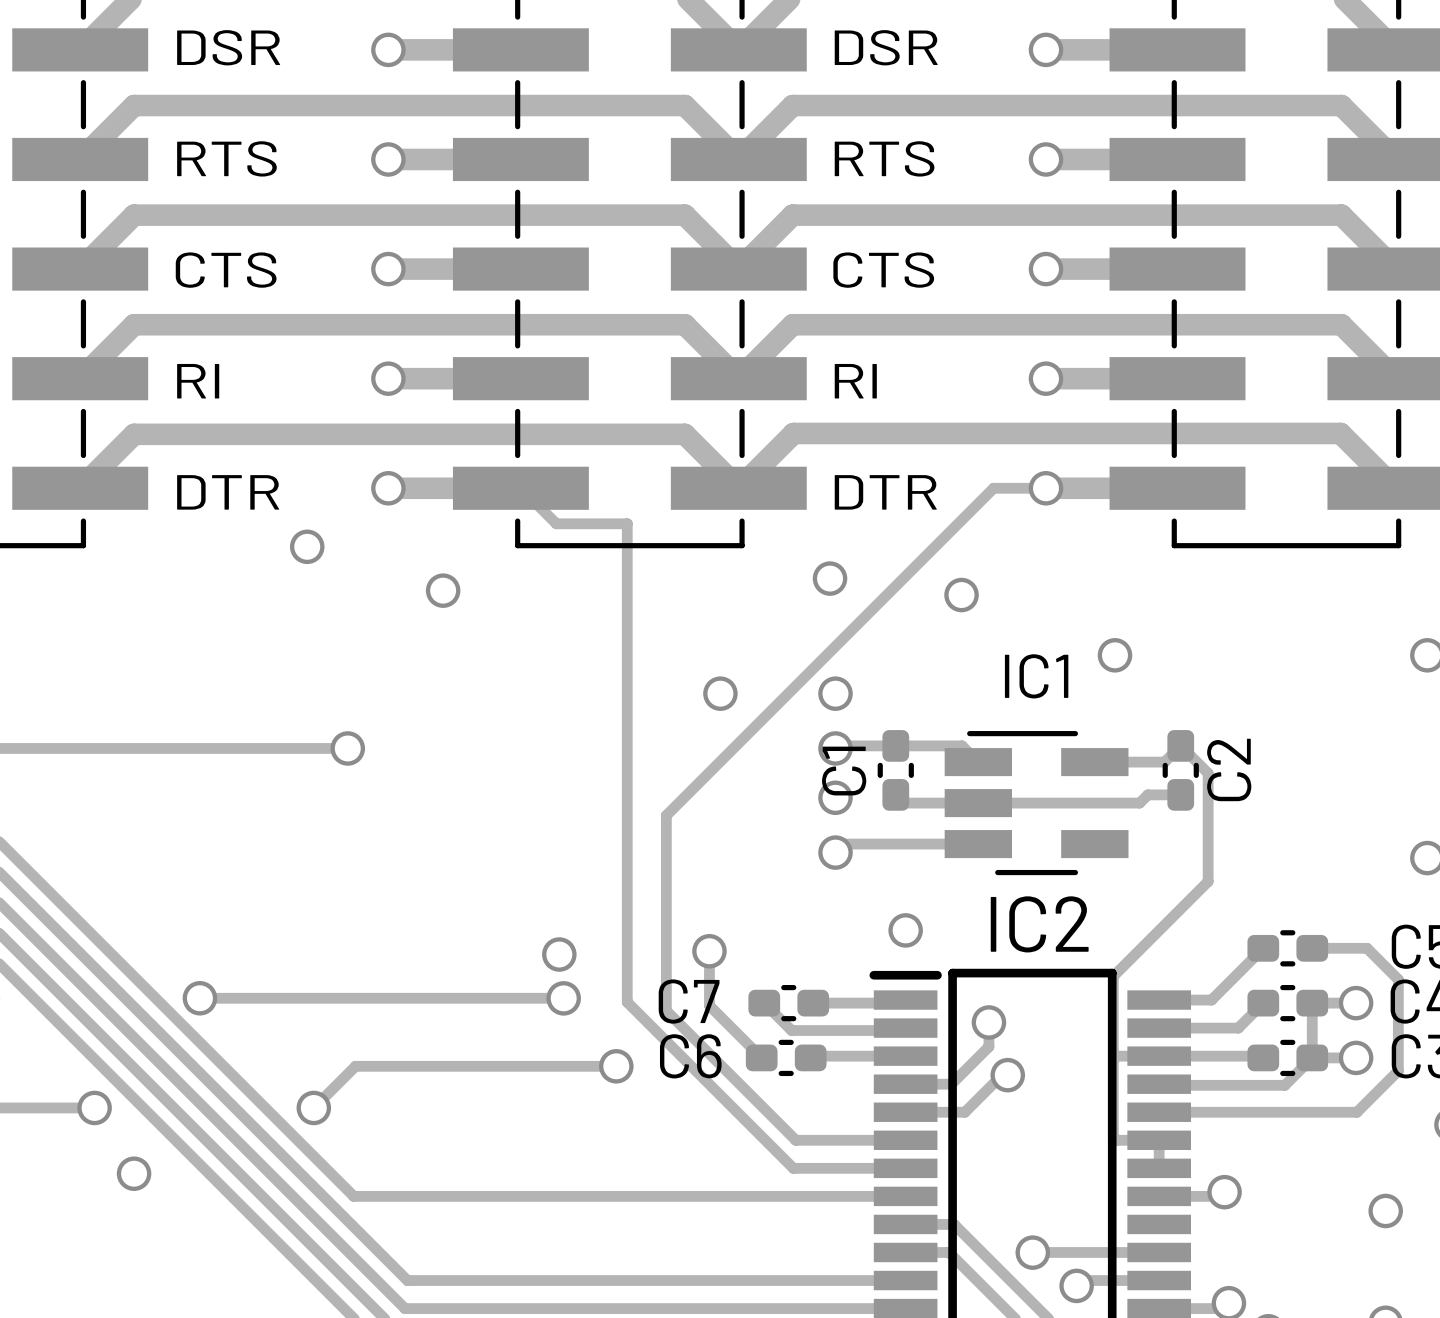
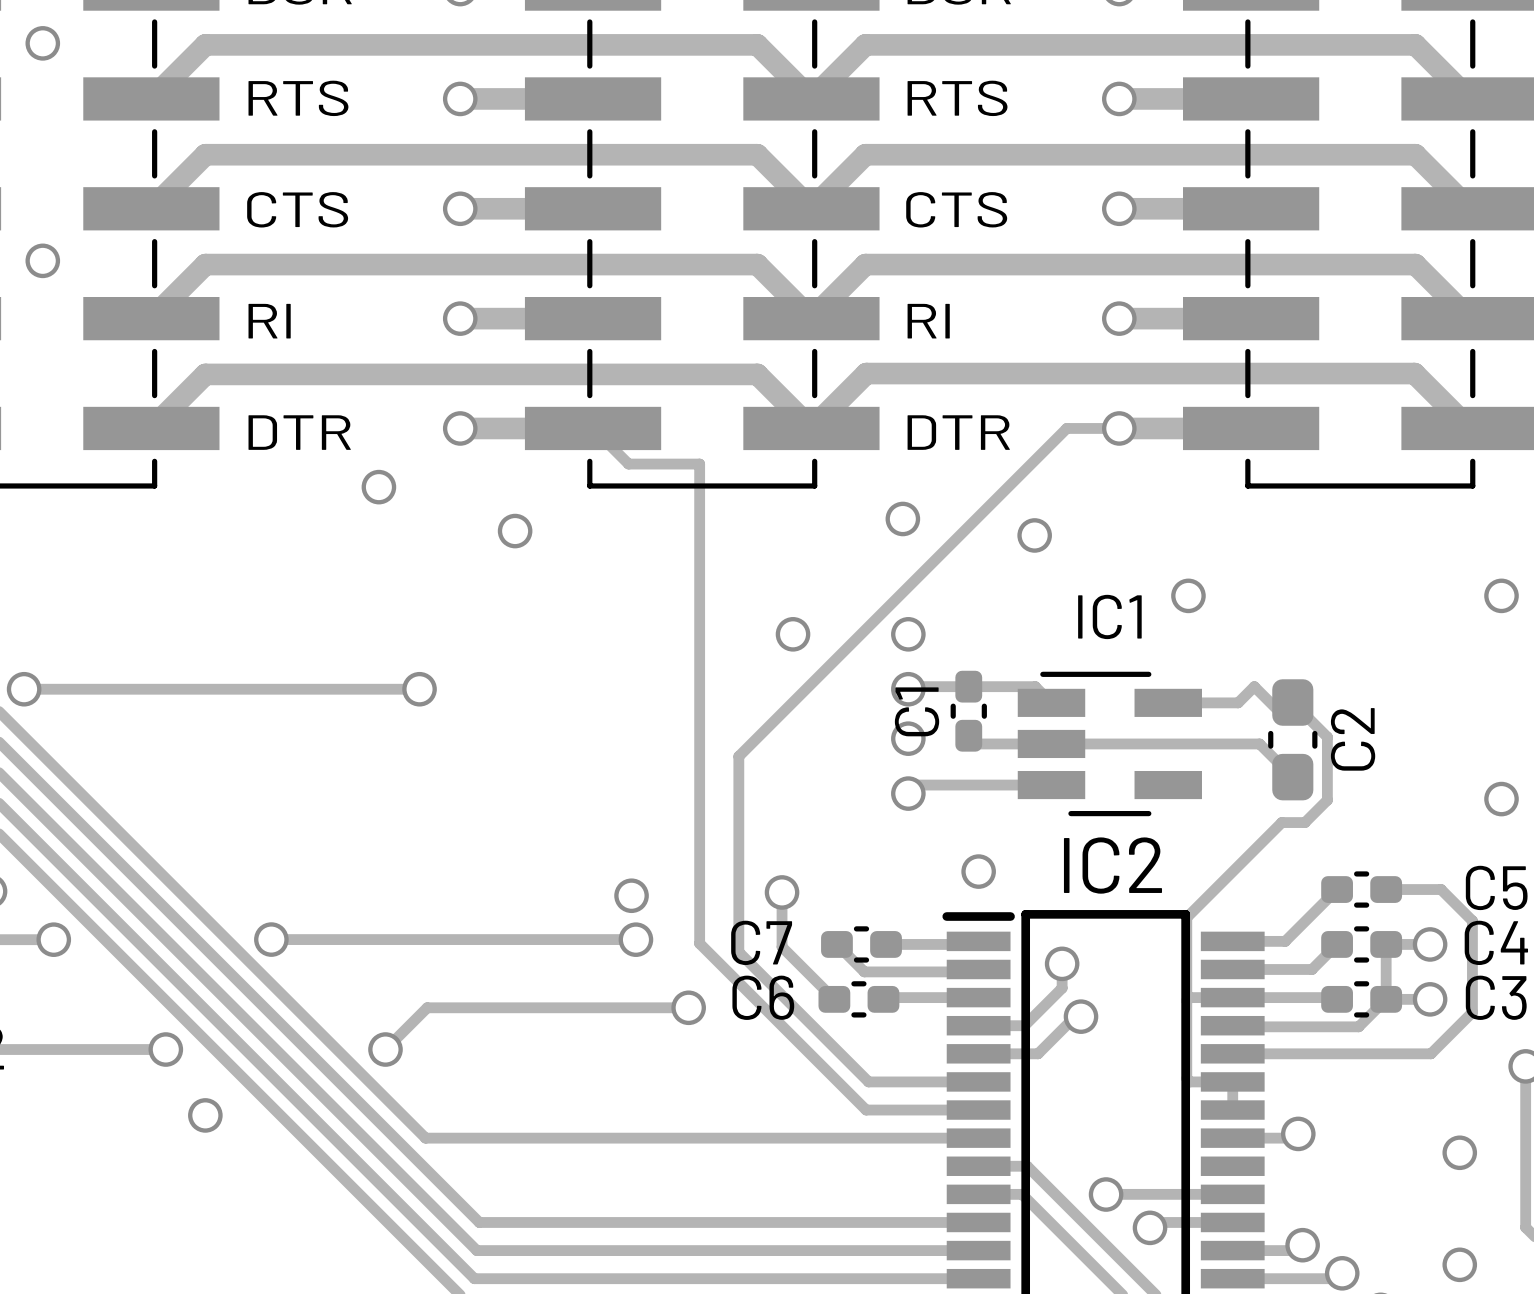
C2 footprint: [1162, 730, 1199, 811] -> [1268, 679, 1318, 801]
track: (1208, 773) (1208, 881) -> (1292, 702) (1327, 737) (1327, 800) (1304, 822) (1281, 822)
track: (1180, 794) (1147, 794) (1139, 803) -> (1292, 777) (1259, 743) (1213, 743)

